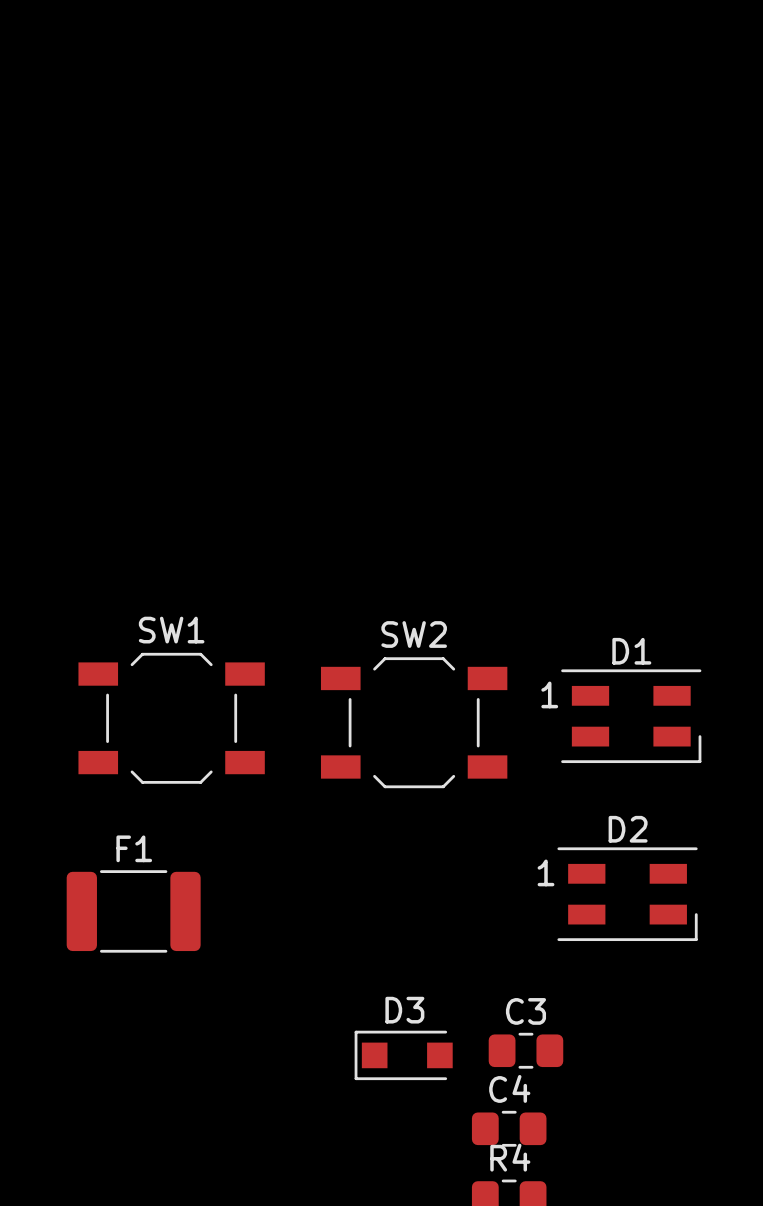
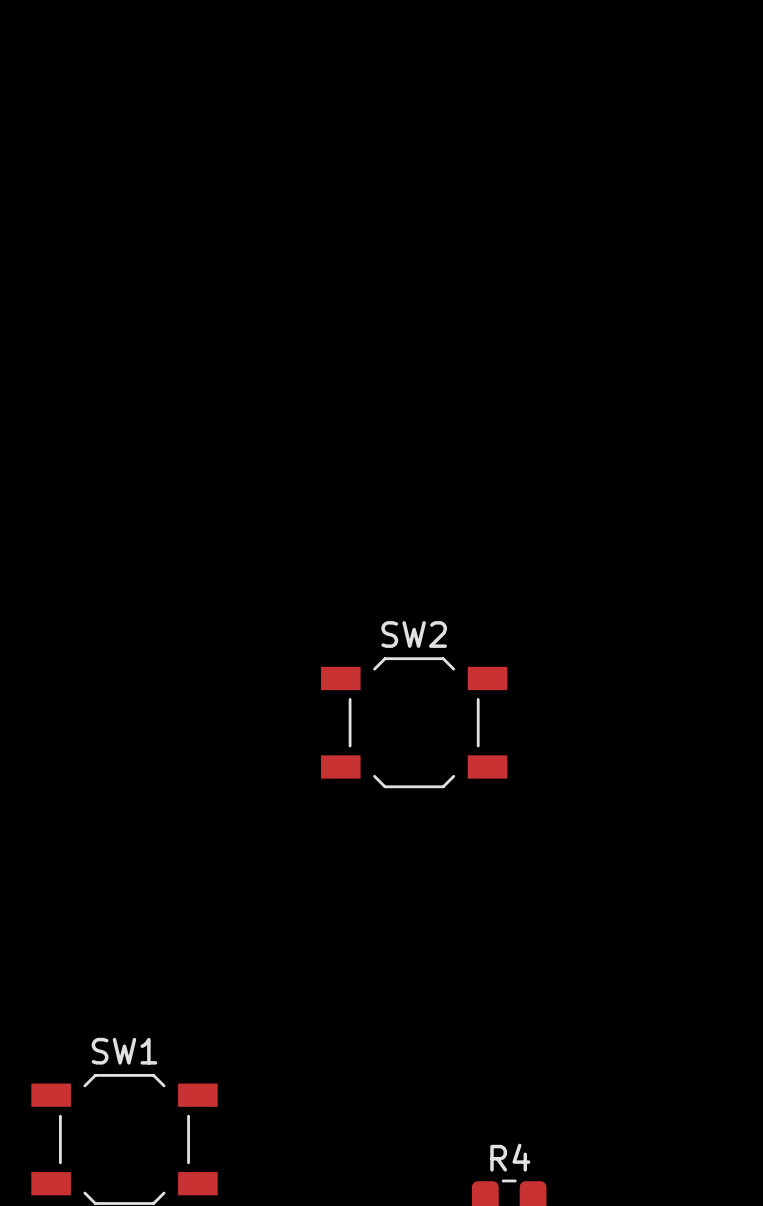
D1: (631, 716) -> none
SW1 position: (171, 718) -> (124, 1139)
D2: (627, 894) -> none
F1: (133, 911) -> none
C3: (525, 1050) -> none
D3: (403, 1055) -> none
C4: (509, 1128) -> none

